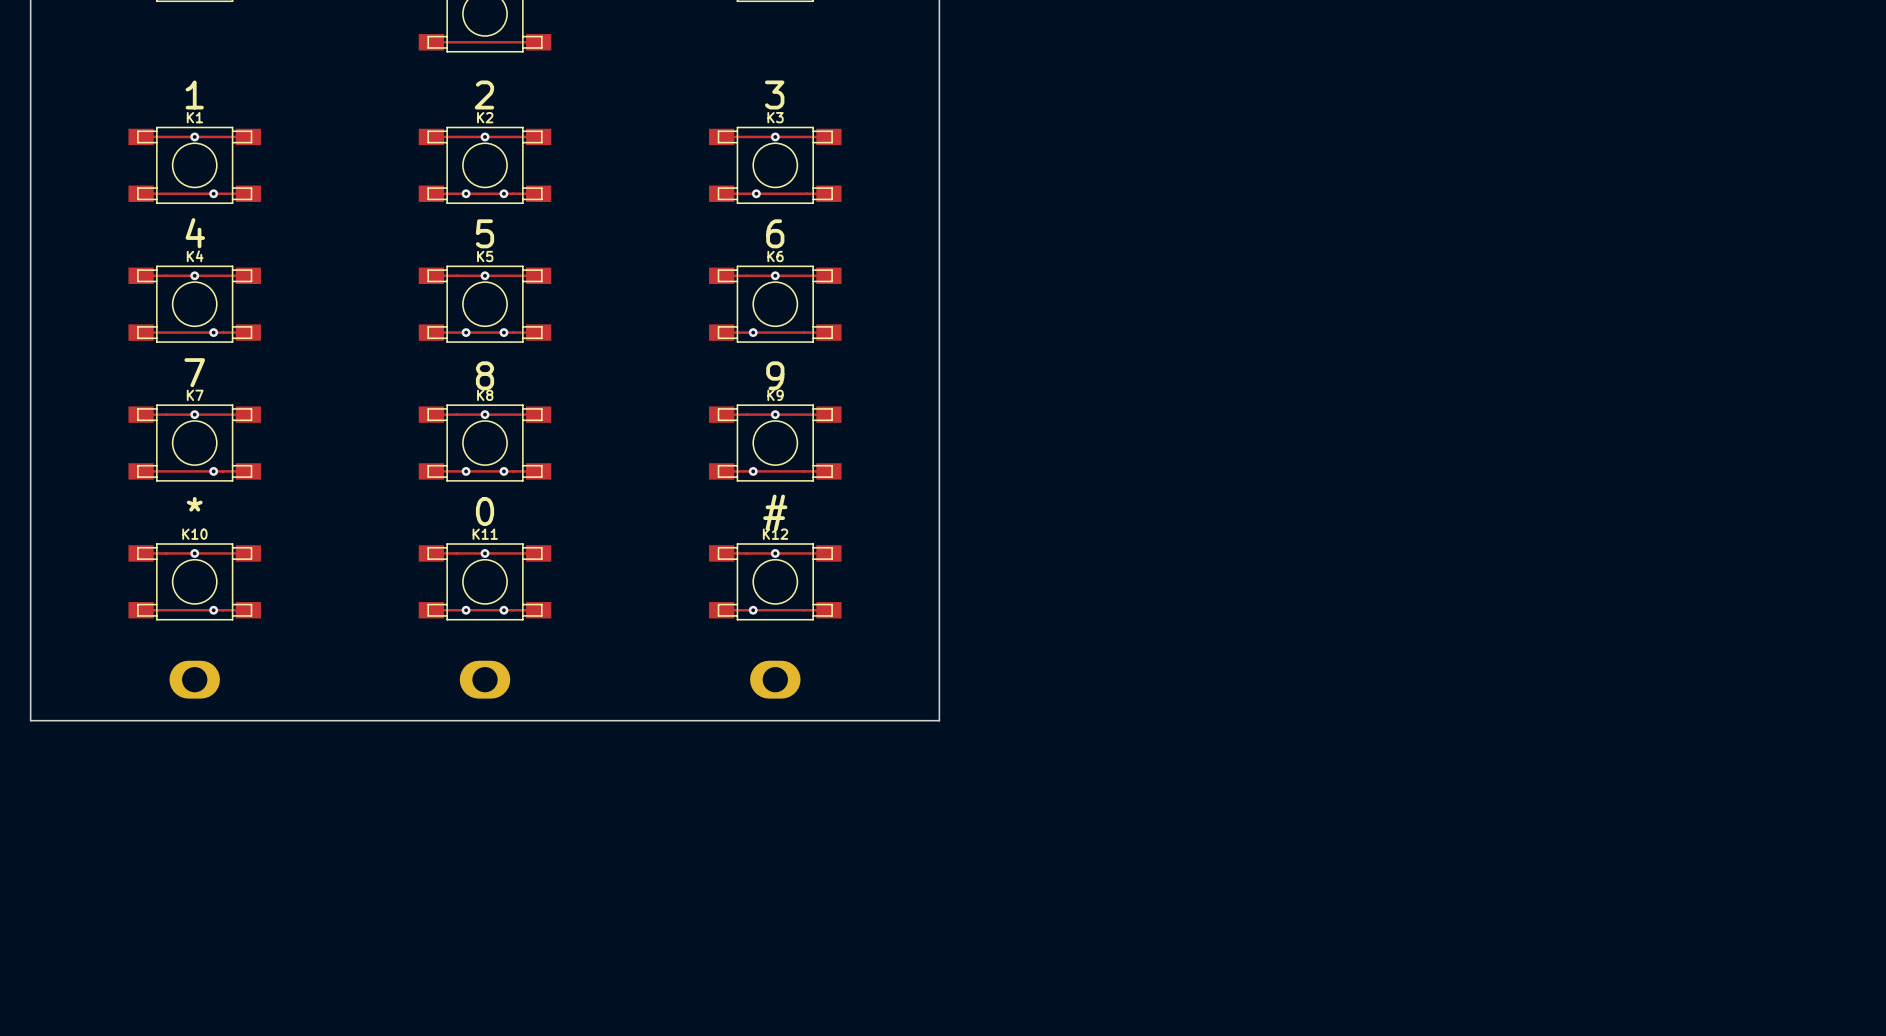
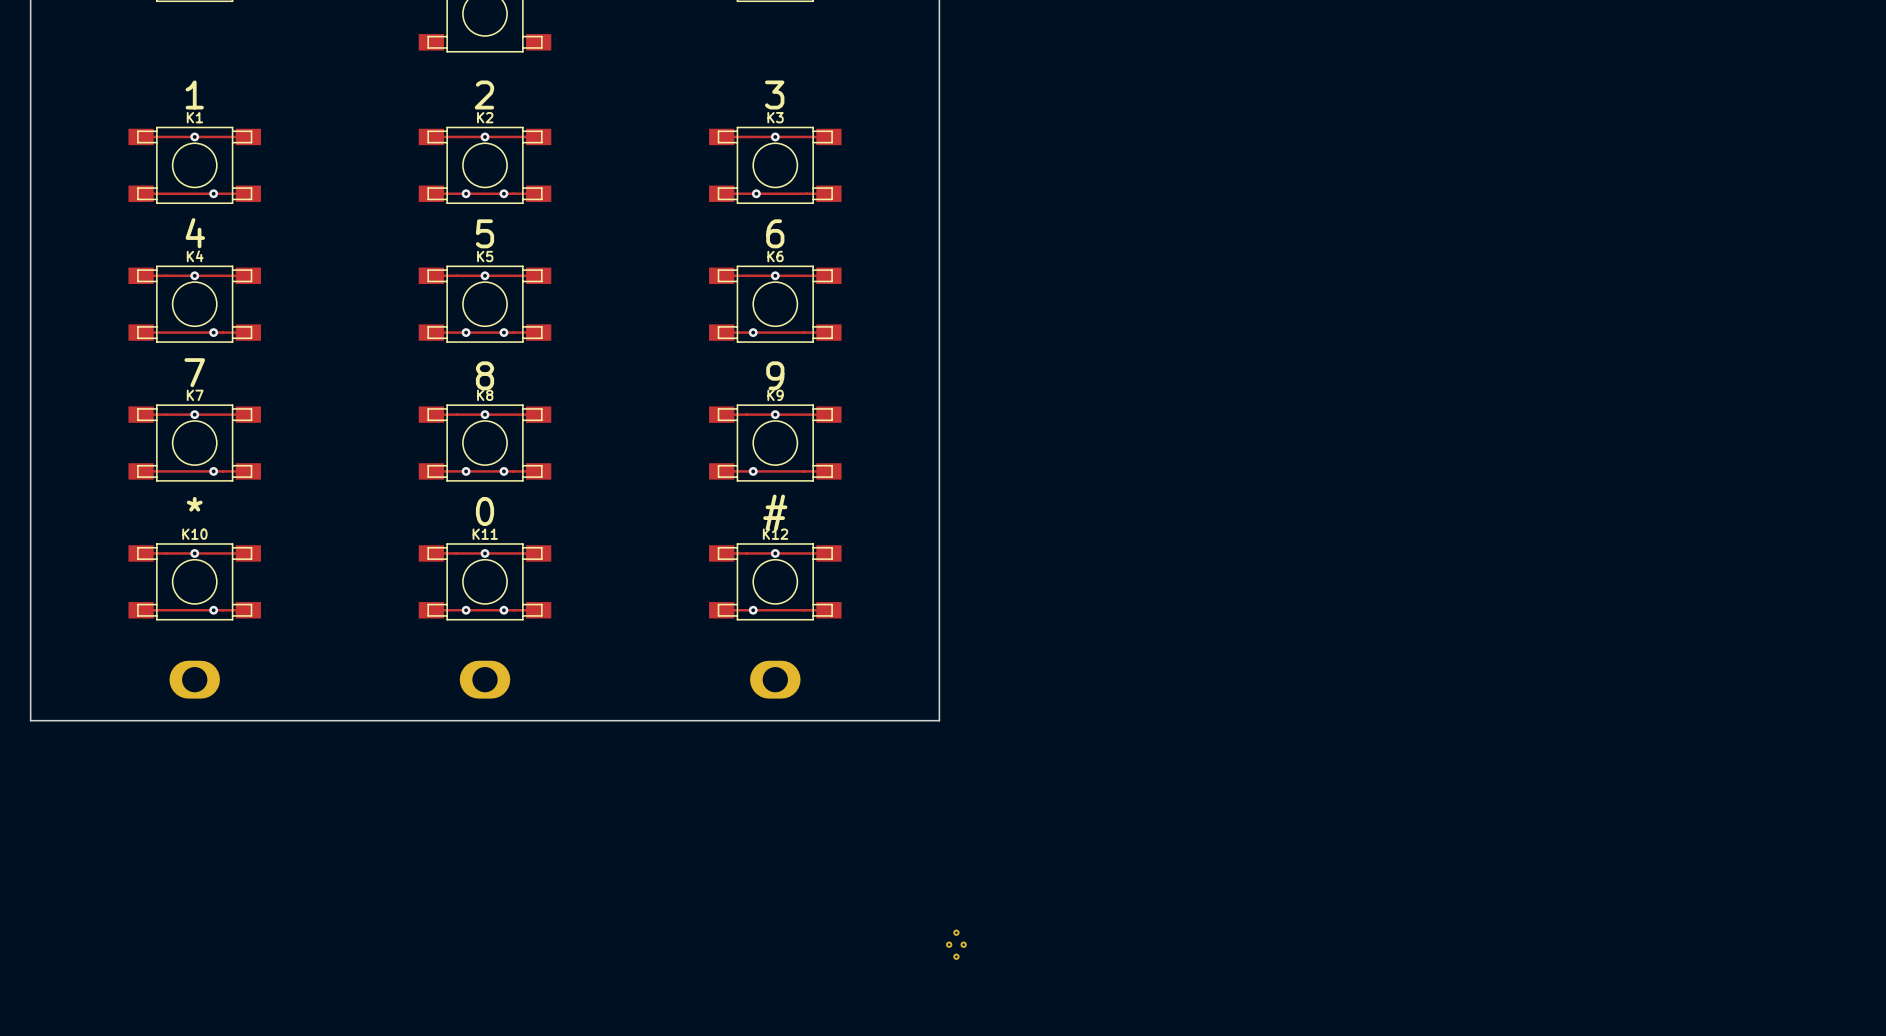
track: (431, 42) (538, 42) -> none
part: none -> (956, 944)

